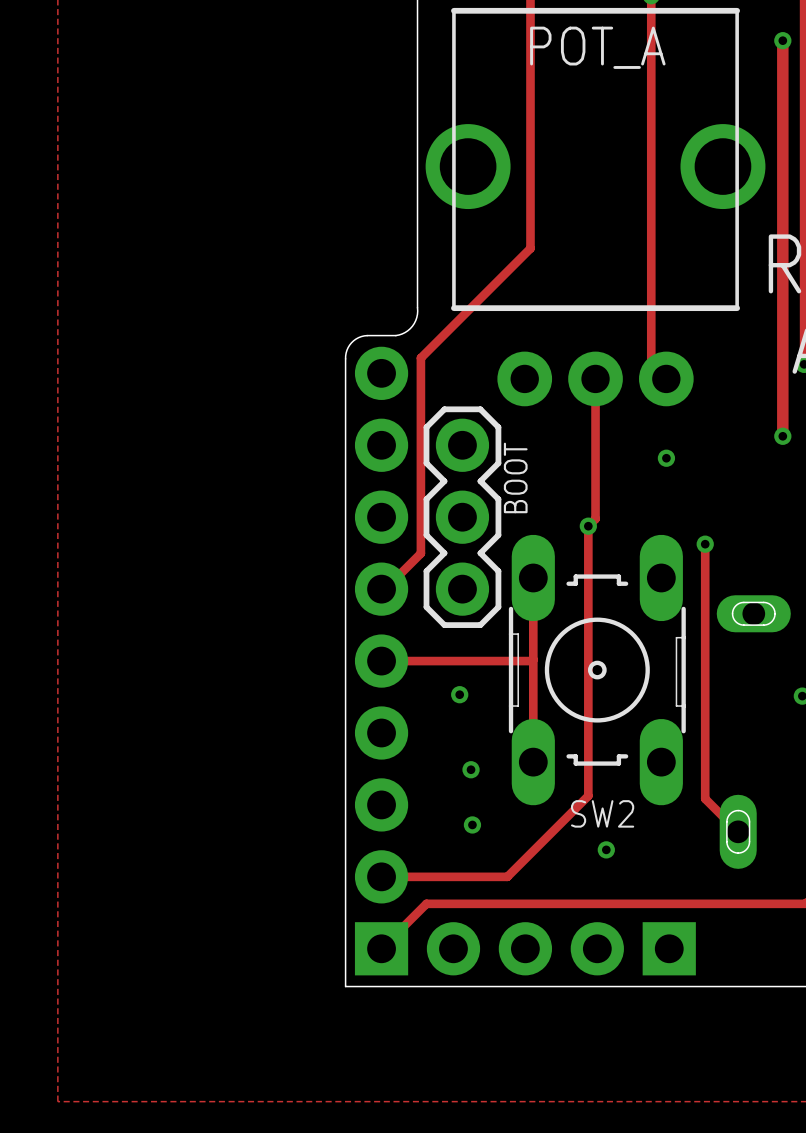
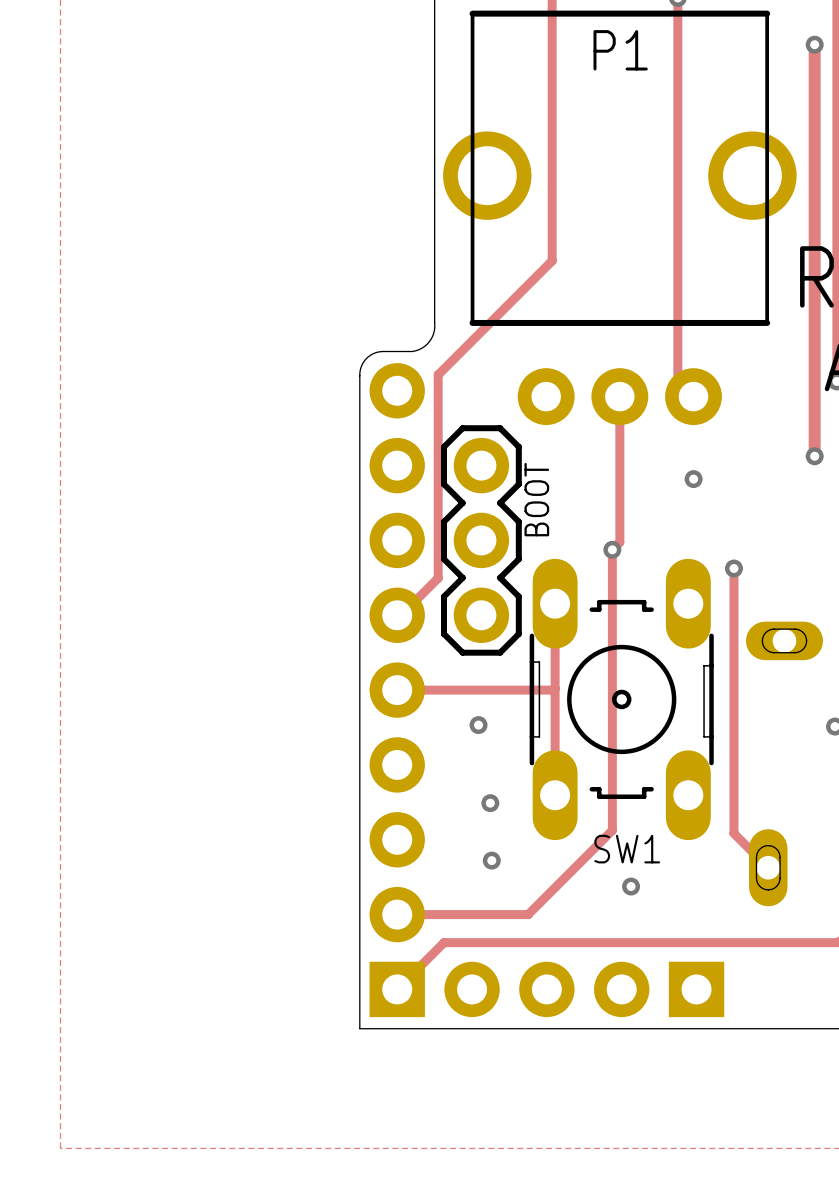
POT_A name: POT_A (597, 47) -> P1 (620, 50)
SW2 name: SW2 (602, 813) -> SW1 (627, 849)

